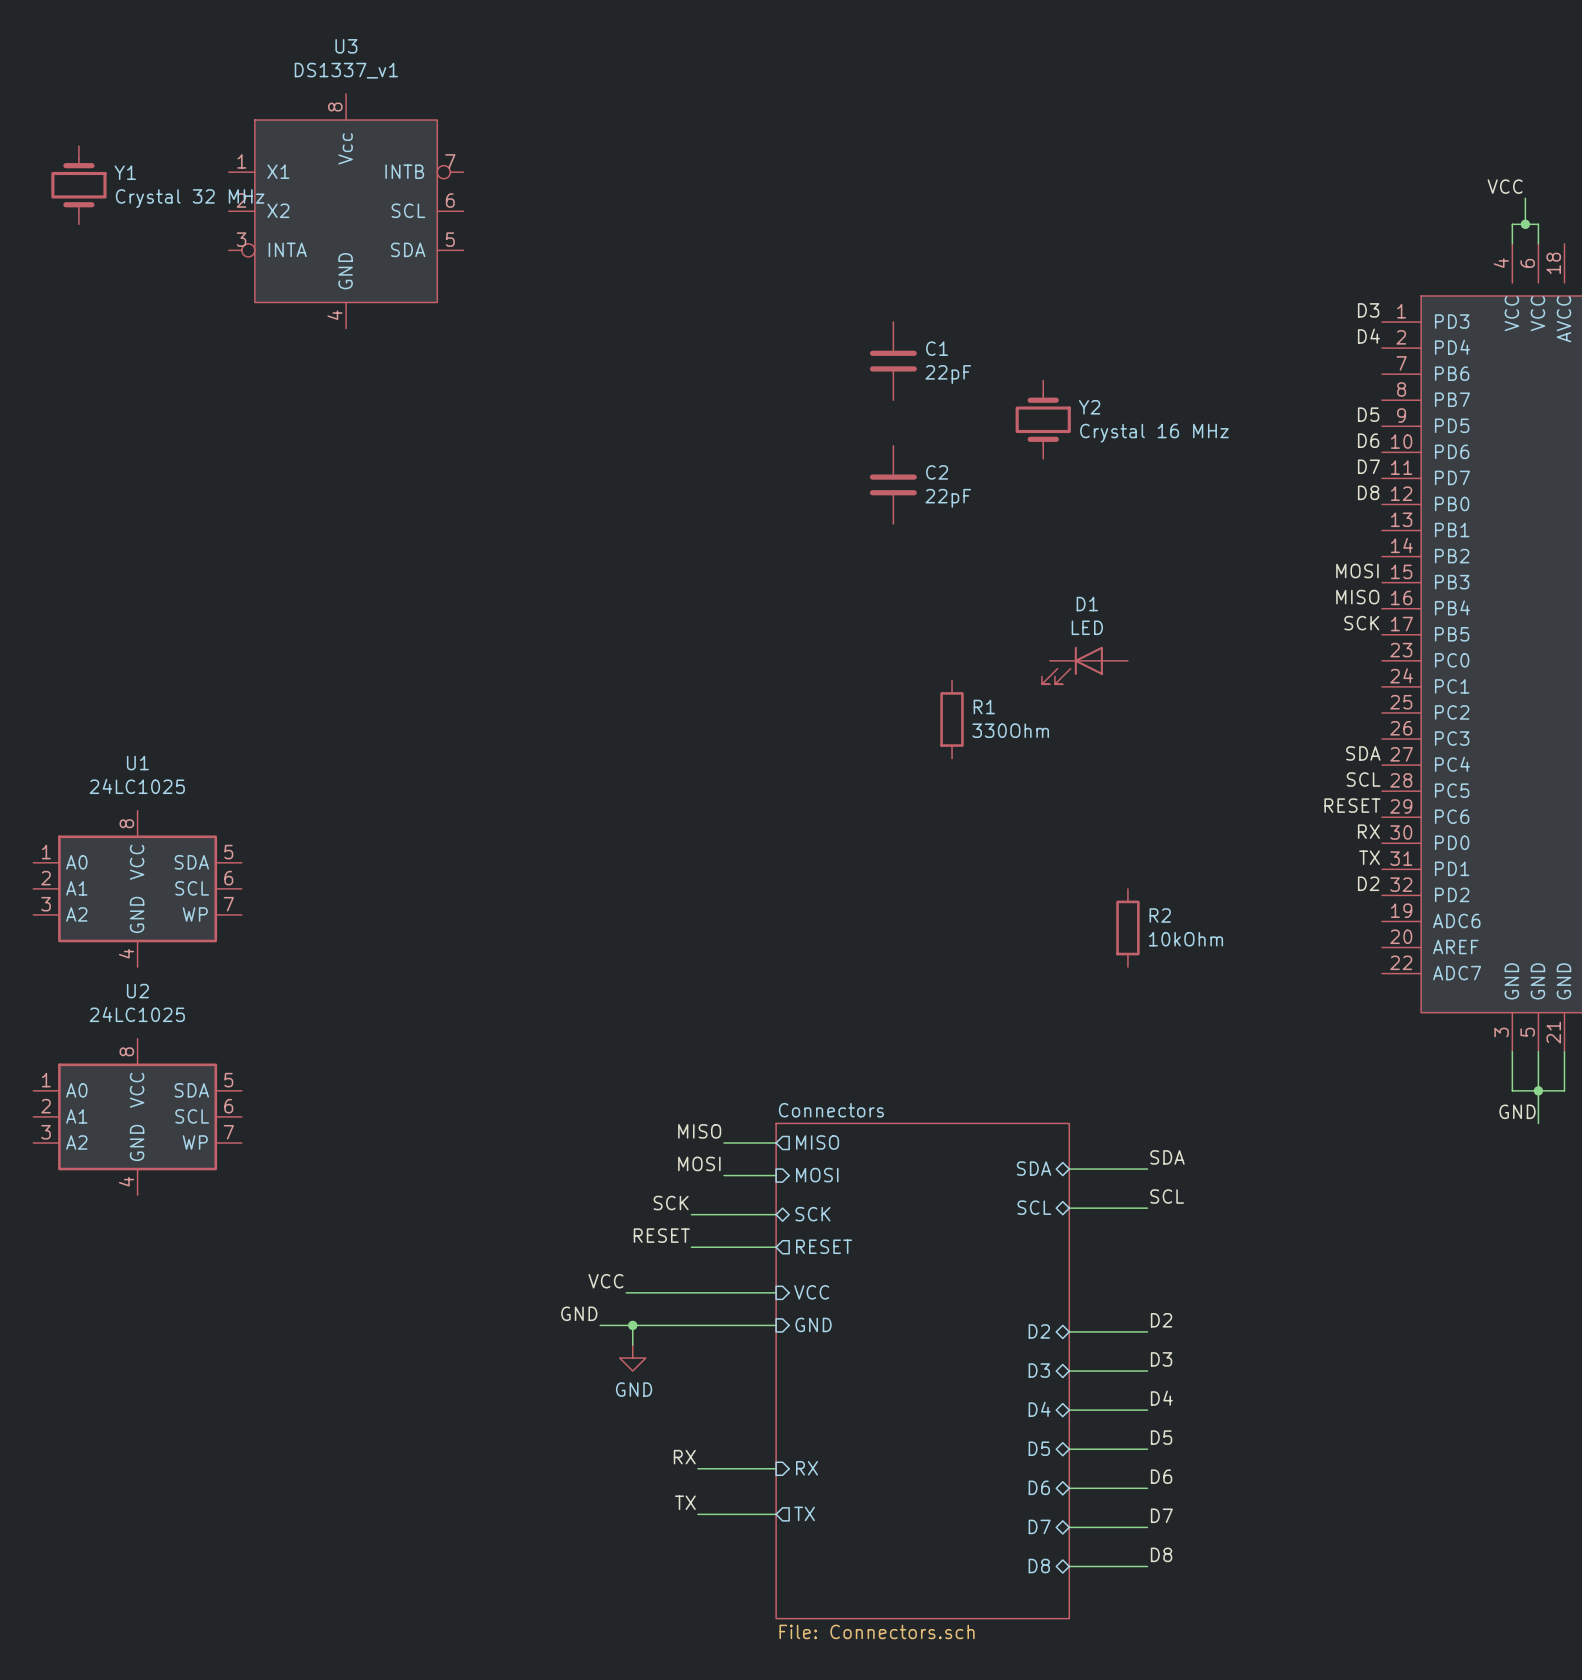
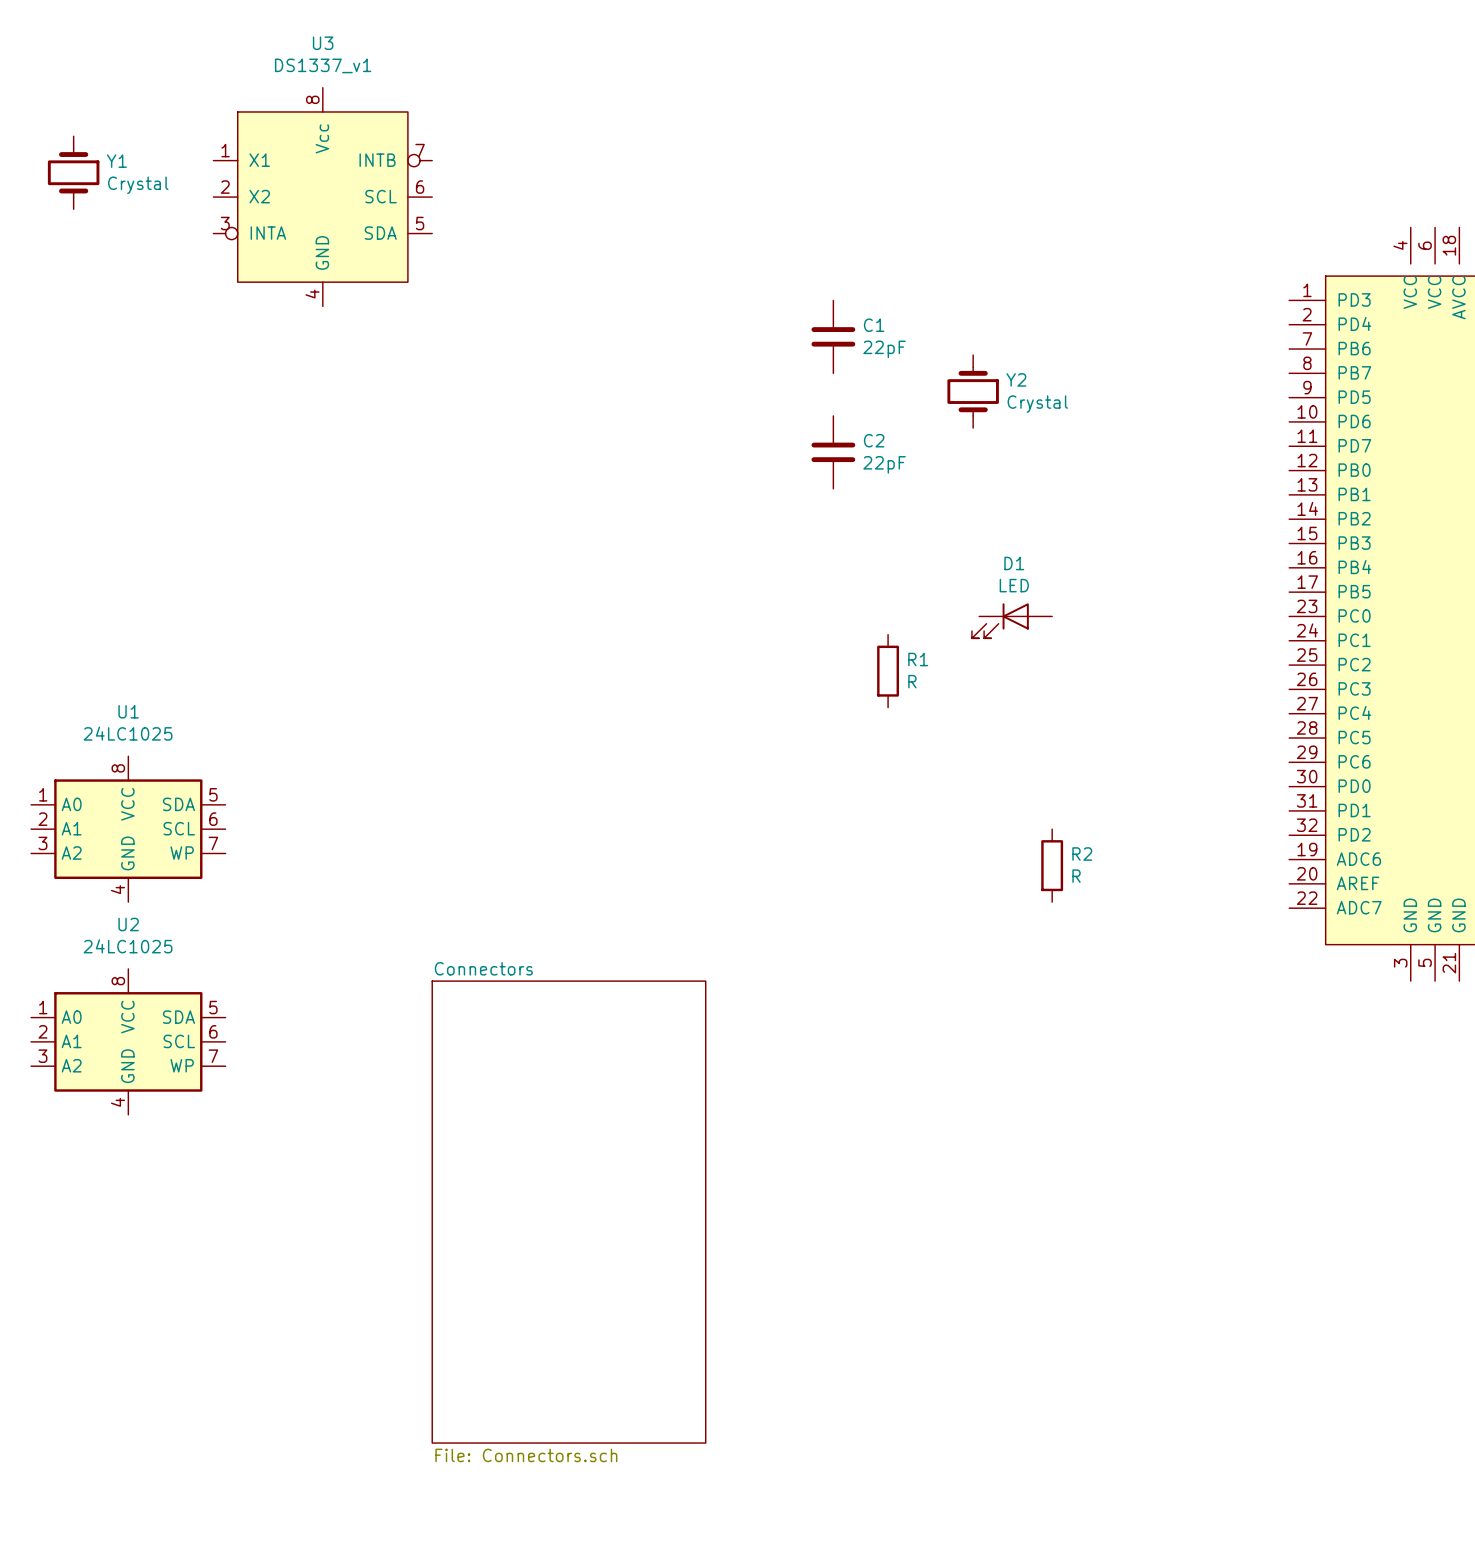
label: VCC (1505, 186) -> none
Y1 value: Crystal 32 MHz (190, 198) -> Crystal (138, 185)
wire: (1525, 198) (1525, 224) -> none
junction: (1525, 224) -> none
wire: (1512, 243) (1512, 224) (1538, 224) (1538, 243) -> none
label: D3 (1368, 310) -> none
label: D4 (1368, 336) -> none
label: D5 (1368, 414) -> none
Y2 value: Crystal 16 MHz (1154, 433) -> Crystal (1037, 404)
label: D6 (1368, 440) -> none
label: D7 (1368, 466) -> none
label: D8 (1368, 492) -> none
label: MOSI (1357, 571) -> none
label: MISO (1357, 597) -> none
label: SCK (1361, 623) -> none
R1 value: 330Ohm (1010, 730) -> R (912, 681)
label: SDA (1363, 753) -> none
label: SCL (1363, 779) -> none
label: RESET (1352, 805) -> none
label: RX (1368, 831) -> none
label: TX (1369, 857) -> none
label: D2 (1368, 883) -> none
R2 value: 10kOhm (1185, 939) -> R (1076, 876)
wire: (1512, 1051) (1512, 1090) (1564, 1090) (1564, 1051) -> none
wire: (1538, 1051) (1538, 1123) -> none
junction: (1538, 1090) -> none
label: GND (1517, 1111) -> none
label: MISO (699, 1131) -> none
wire: (723, 1142) (776, 1142) -> none
sheet pin: MISO (817, 1142) -> none
label: SDA (1167, 1157) -> none
label: MOSI (699, 1163) -> none
sheet pin: SDA (1034, 1168) -> none
wire: (1069, 1169) (1147, 1169) -> none
wire: (723, 1175) (776, 1175) -> none
sheet pin: MOSI (817, 1175) -> none
label: SCL (1167, 1196) -> none
label: SCK (671, 1203) -> none
sheet pin: SCL (1034, 1207) -> none
wire: (1069, 1208) (1147, 1208) -> none
wire: (691, 1214) (776, 1214) -> none
sheet pin: SCK (812, 1214) -> none
label: RESET (661, 1235) -> none
sheet pin: RESET (824, 1246) -> none
wire: (691, 1247) (776, 1247) -> none
label: VCC (605, 1281) -> none
wire: (626, 1292) (776, 1292) -> none
sheet pin: VCC (811, 1292) -> none
sheet Connectors: none -> File: Connectors.sch (568, 1212)
label: GND (579, 1313) -> none
label: D2 (1161, 1320) -> none
sheet pin: GND (813, 1324) -> none
wire: (600, 1325) (776, 1325) -> none
wire: (632, 1325) (632, 1344) -> none
junction: (632, 1325) -> none
sheet pin: D2 (1039, 1331) -> none
wire: (1069, 1331) (1147, 1331) -> none
power symbol: GND (632, 1358) -> none
label: D3 (1161, 1359) -> none
sheet pin: D3 (1039, 1370) -> none
sheet Connectors: File: Connectors.sch (922, 1371) -> none
wire: (1069, 1371) (1147, 1371) -> none
label: D4 (1161, 1398) -> none
sheet pin: D4 (1039, 1409) -> none
wire: (1069, 1410) (1147, 1410) -> none
label: D5 (1161, 1437) -> none
sheet pin: D5 (1039, 1448) -> none
wire: (1069, 1449) (1147, 1449) -> none
label: RX (684, 1457) -> none
wire: (697, 1468) (776, 1468) -> none
sheet pin: RX (807, 1468) -> none
label: D6 (1161, 1476) -> none
sheet pin: D6 (1039, 1487) -> none
wire: (1069, 1488) (1147, 1488) -> none
label: TX (685, 1502) -> none
sheet pin: TX (804, 1513) -> none
wire: (697, 1514) (776, 1514) -> none
label: D7 (1161, 1515) -> none
sheet pin: D7 (1039, 1526) -> none
wire: (1069, 1527) (1147, 1527) -> none
label: D8 (1161, 1554) -> none
sheet pin: D8 (1039, 1566) -> none
wire: (1069, 1566) (1147, 1566) -> none

